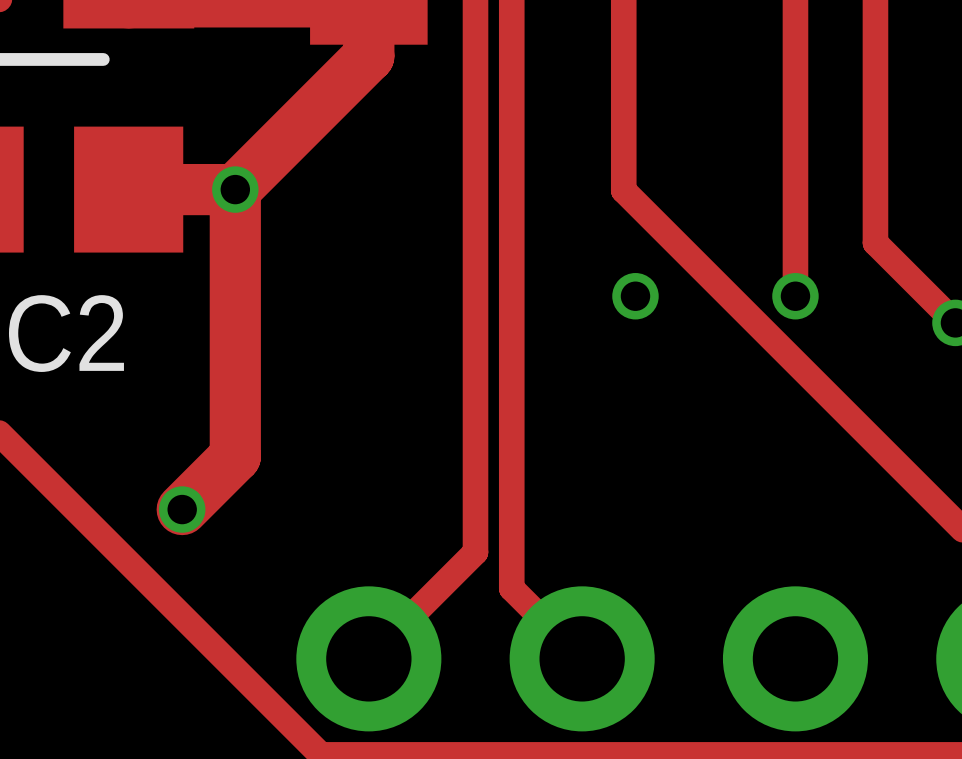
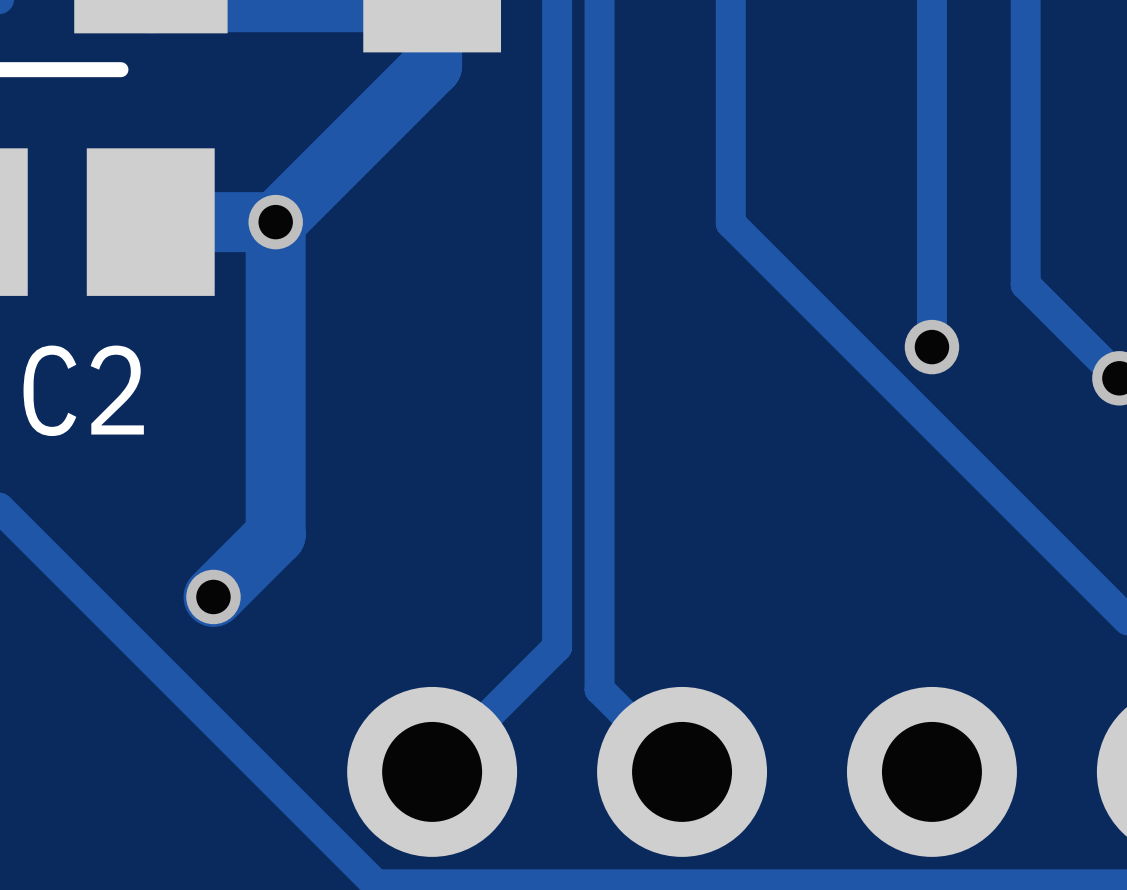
via: (635, 296) -> none

